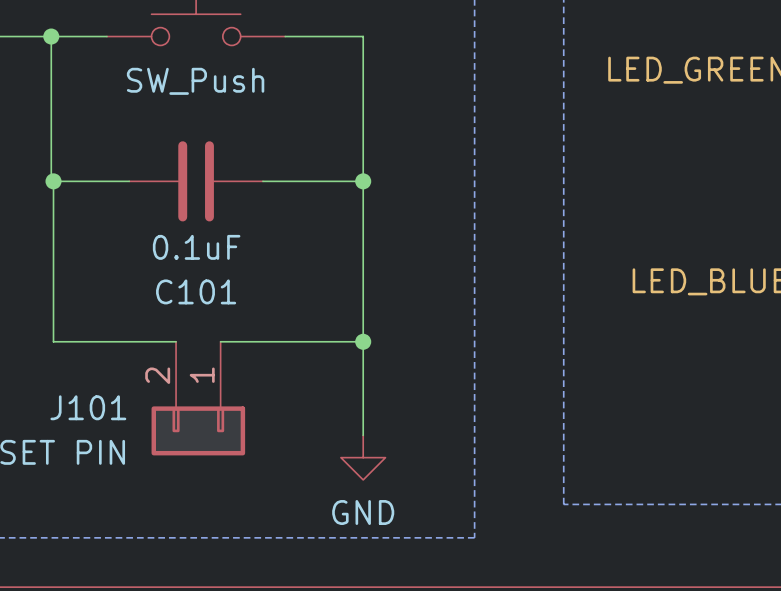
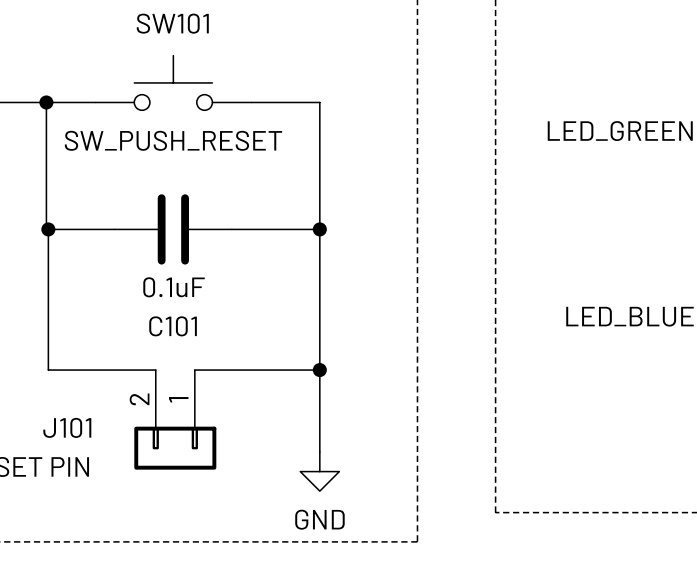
SW101 value: SW_Push (195, 81) -> SW_PUSH_RESET (173, 140)

